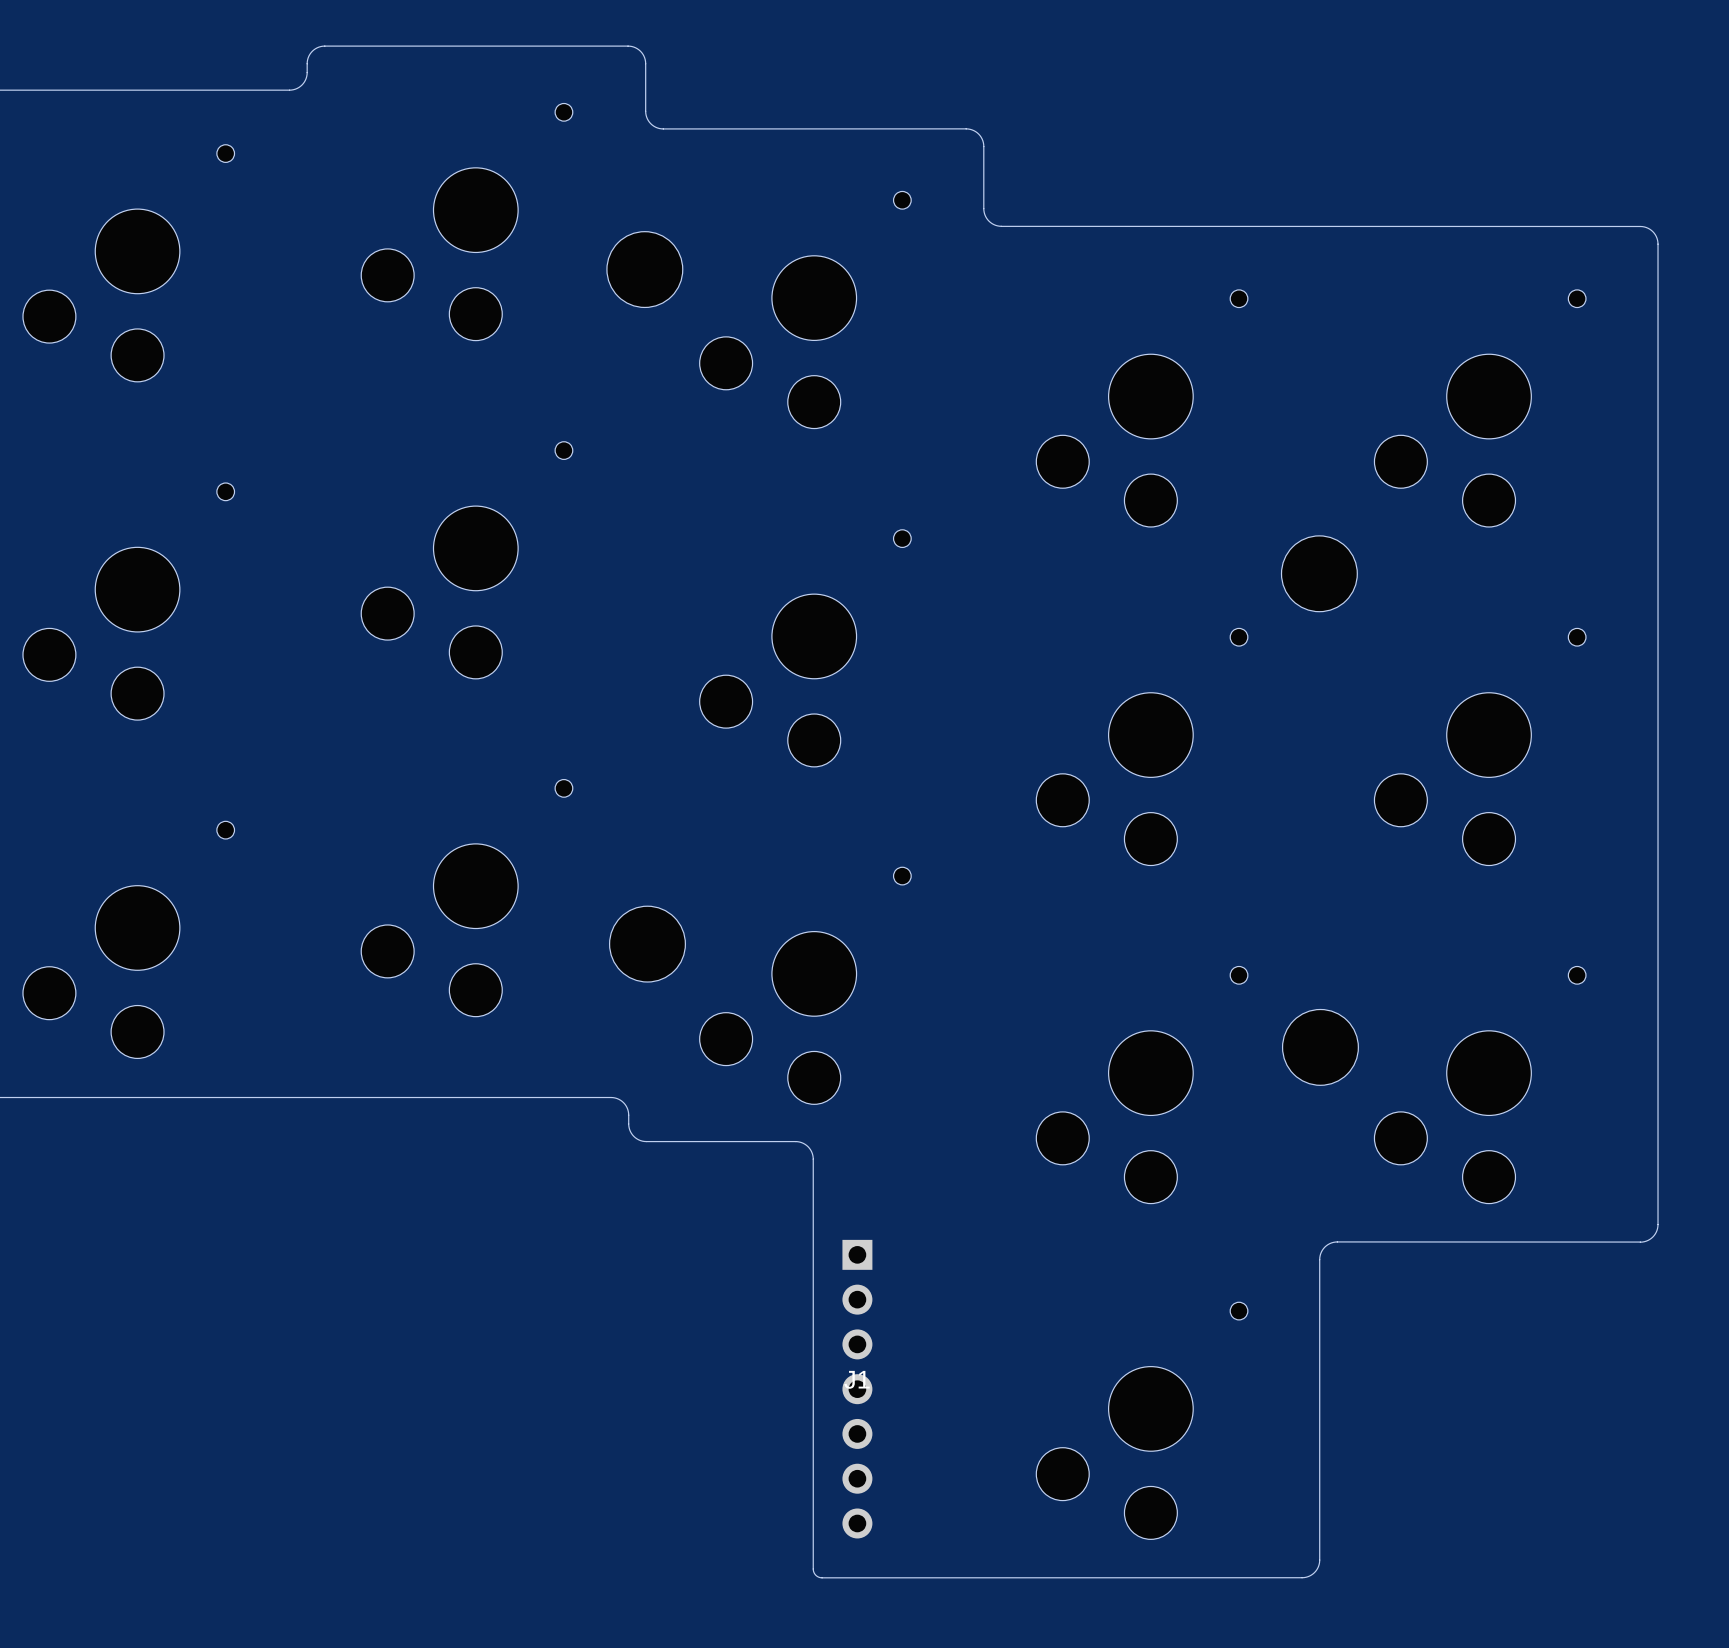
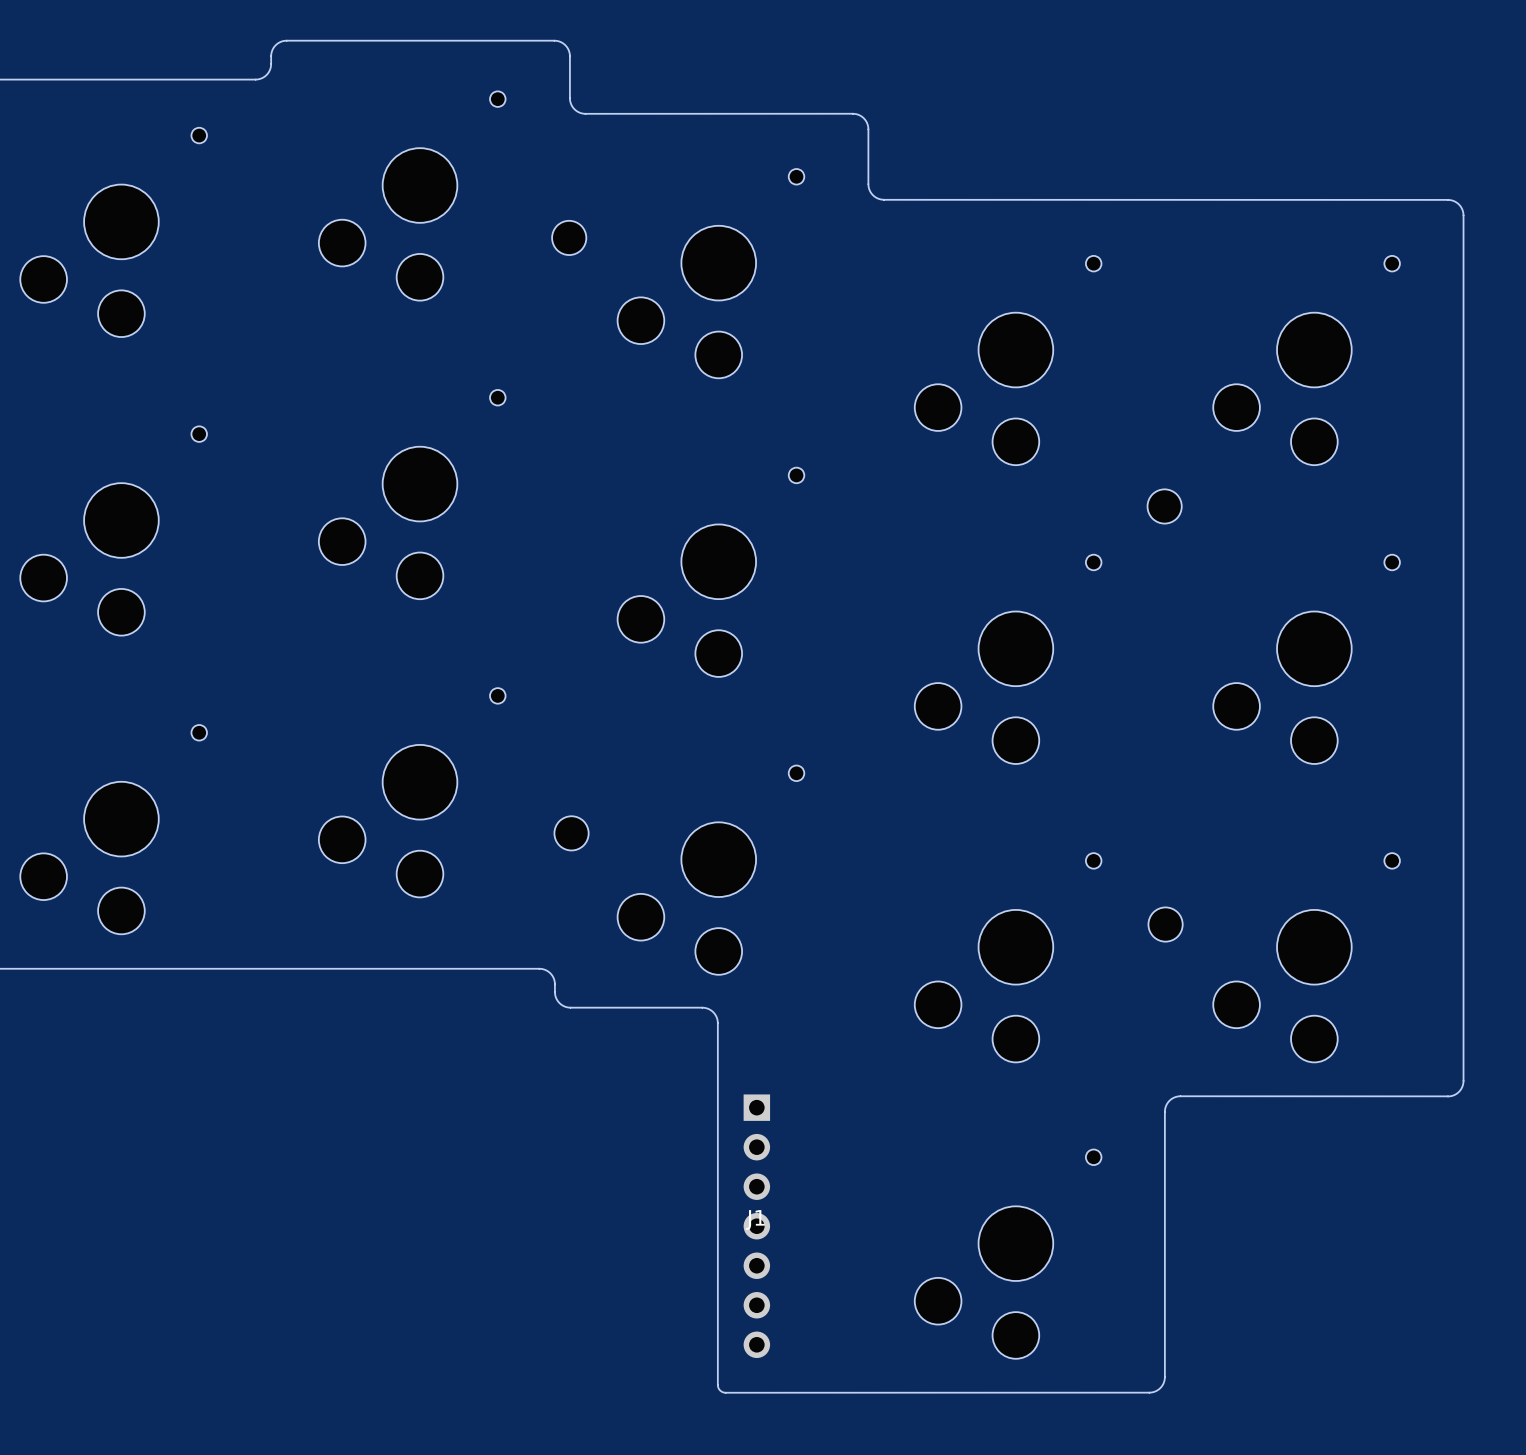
part footprint: [606, 231, 683, 308] -> [552, 220, 587, 256]
part footprint: [1281, 535, 1358, 612] -> [1147, 489, 1182, 524]
part footprint: [609, 906, 686, 983] -> [554, 816, 589, 851]
part footprint: [1282, 1009, 1359, 1086] -> [1148, 907, 1183, 942]

